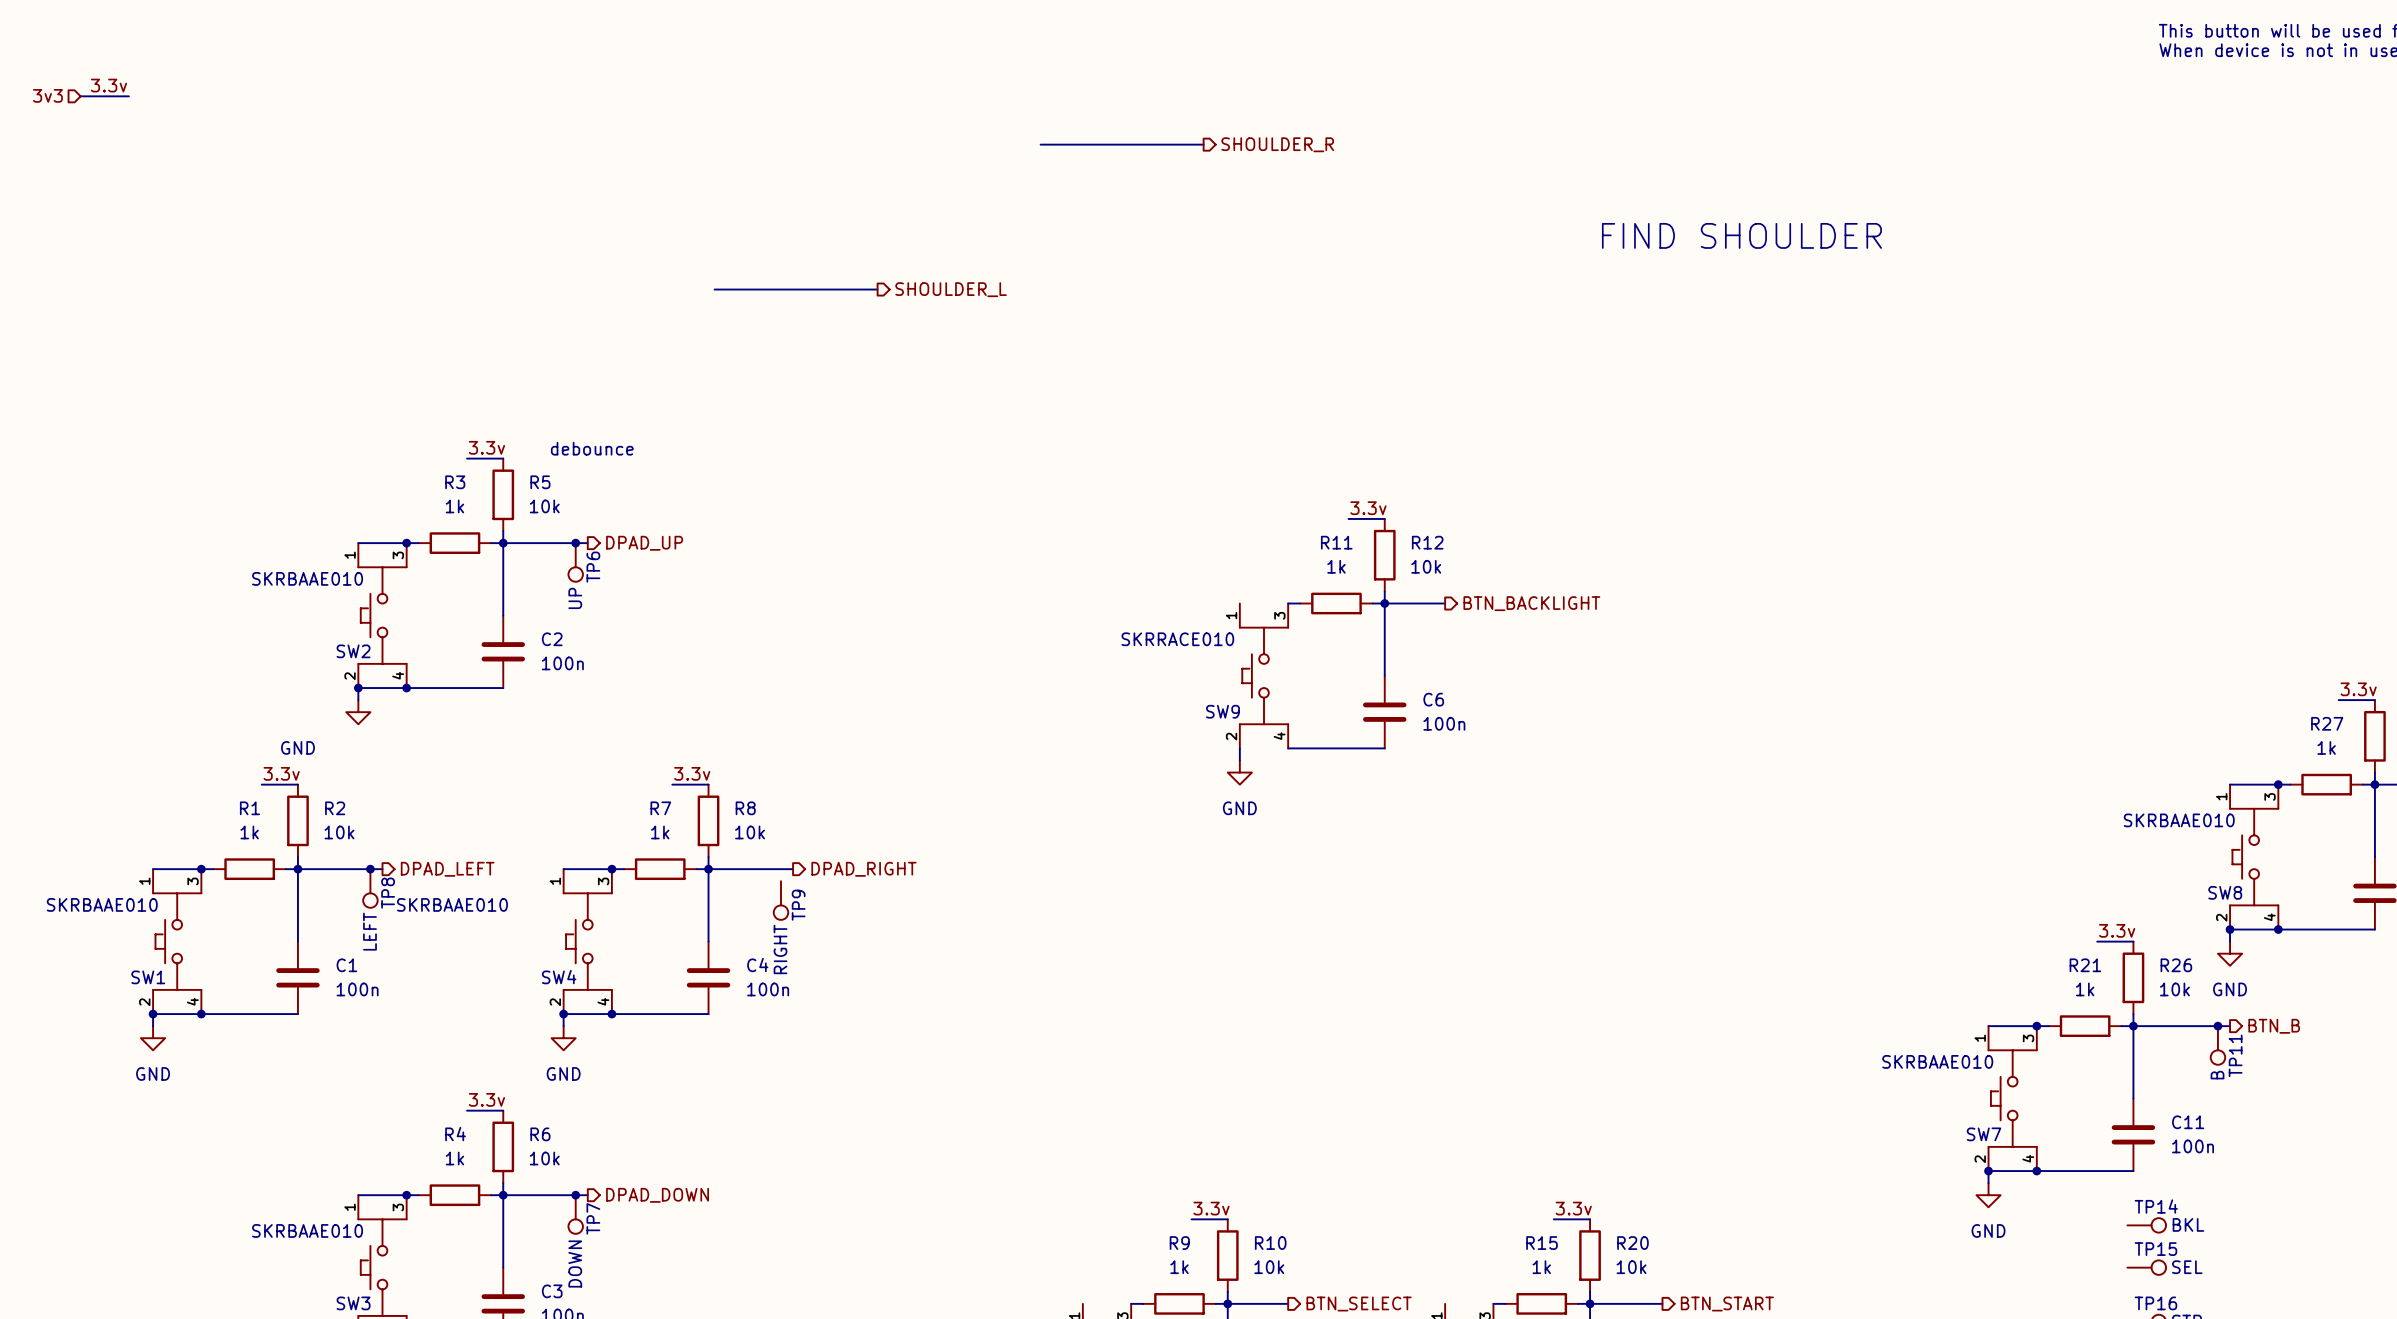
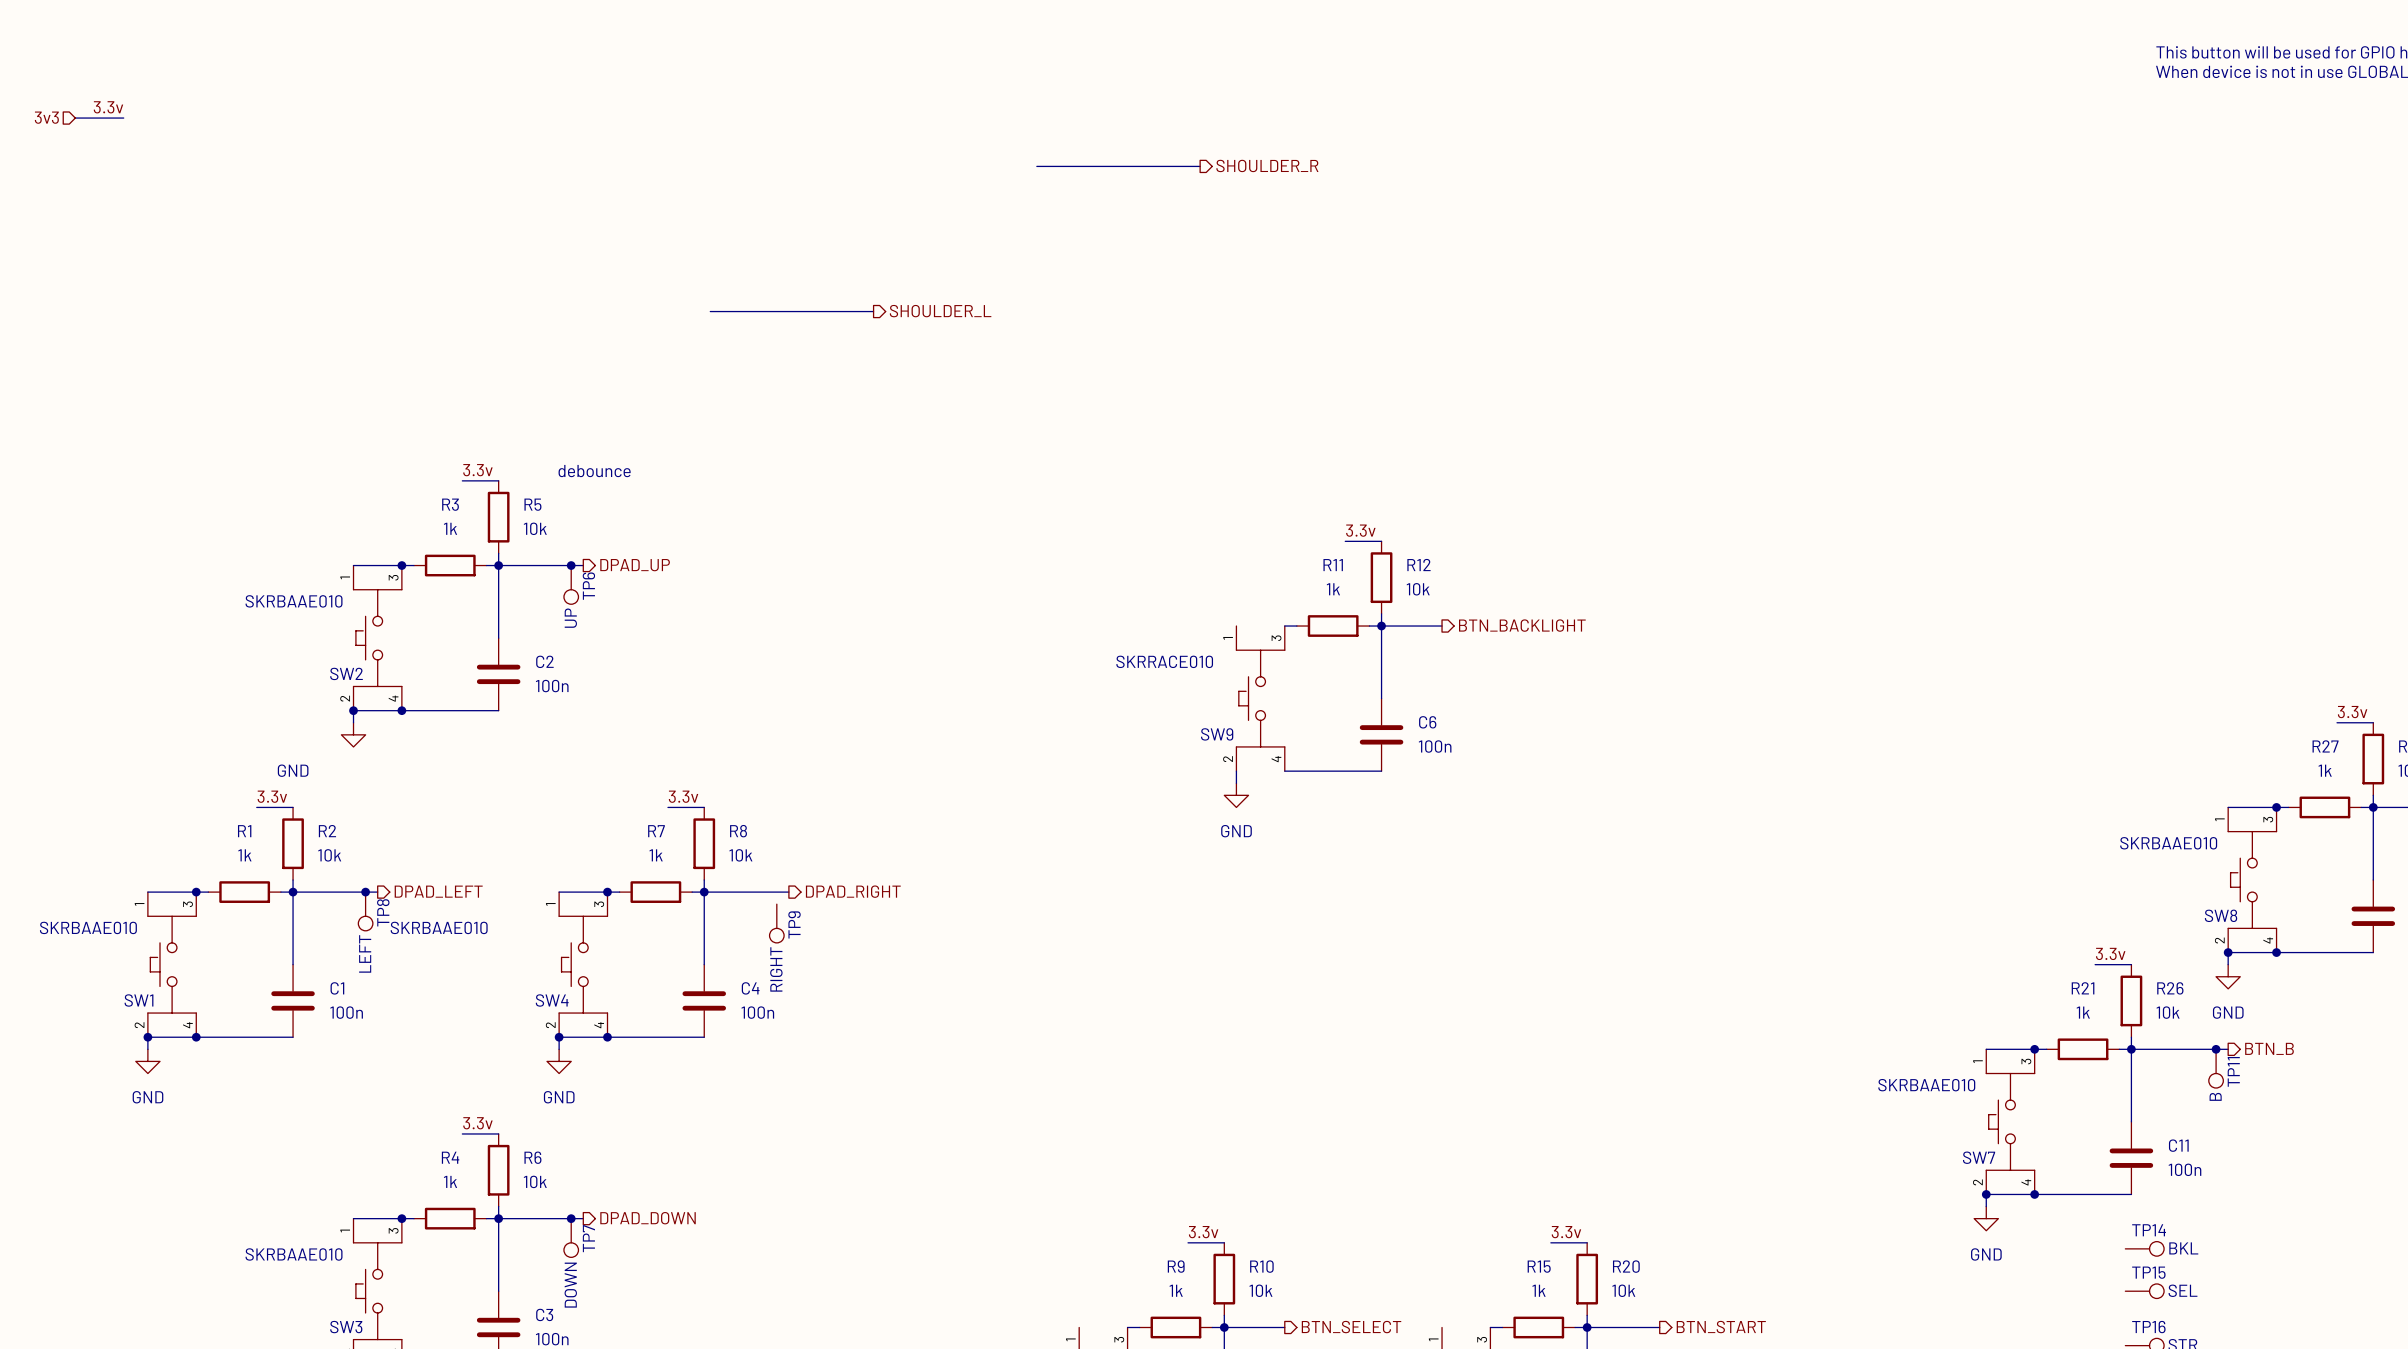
text: FIND SHOULDER (1741, 235) -> none

